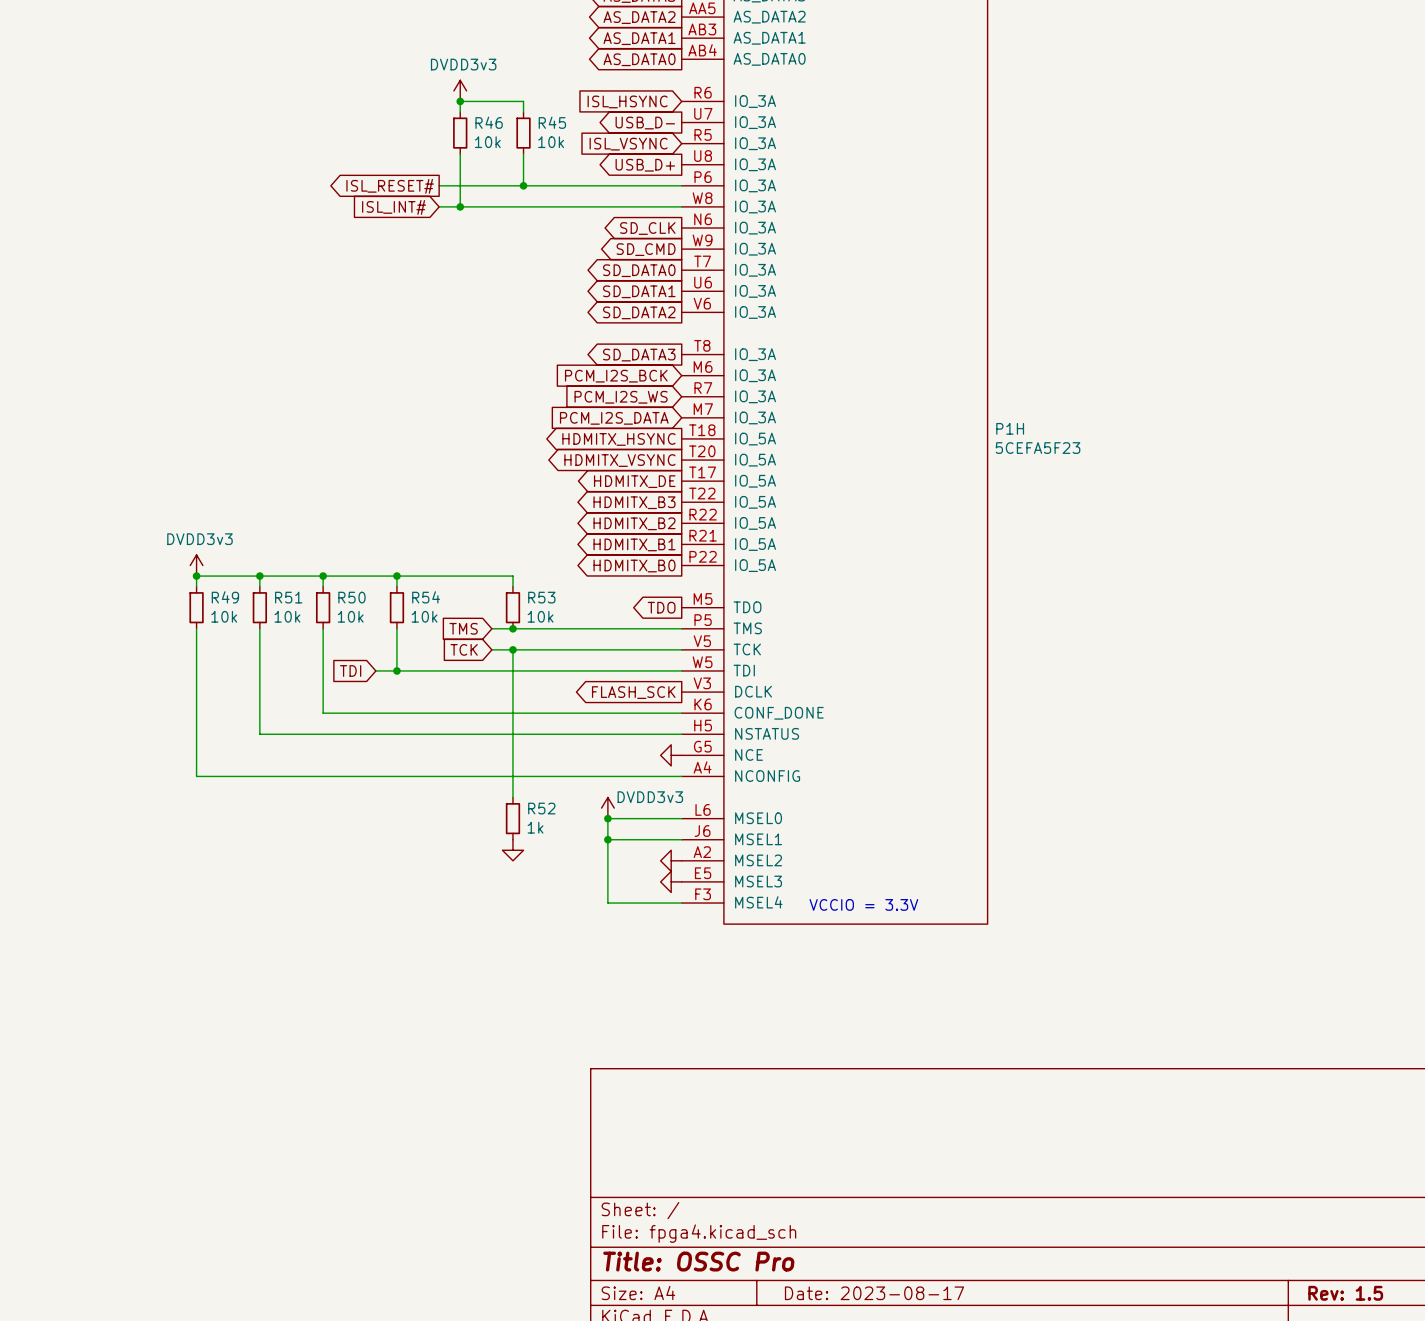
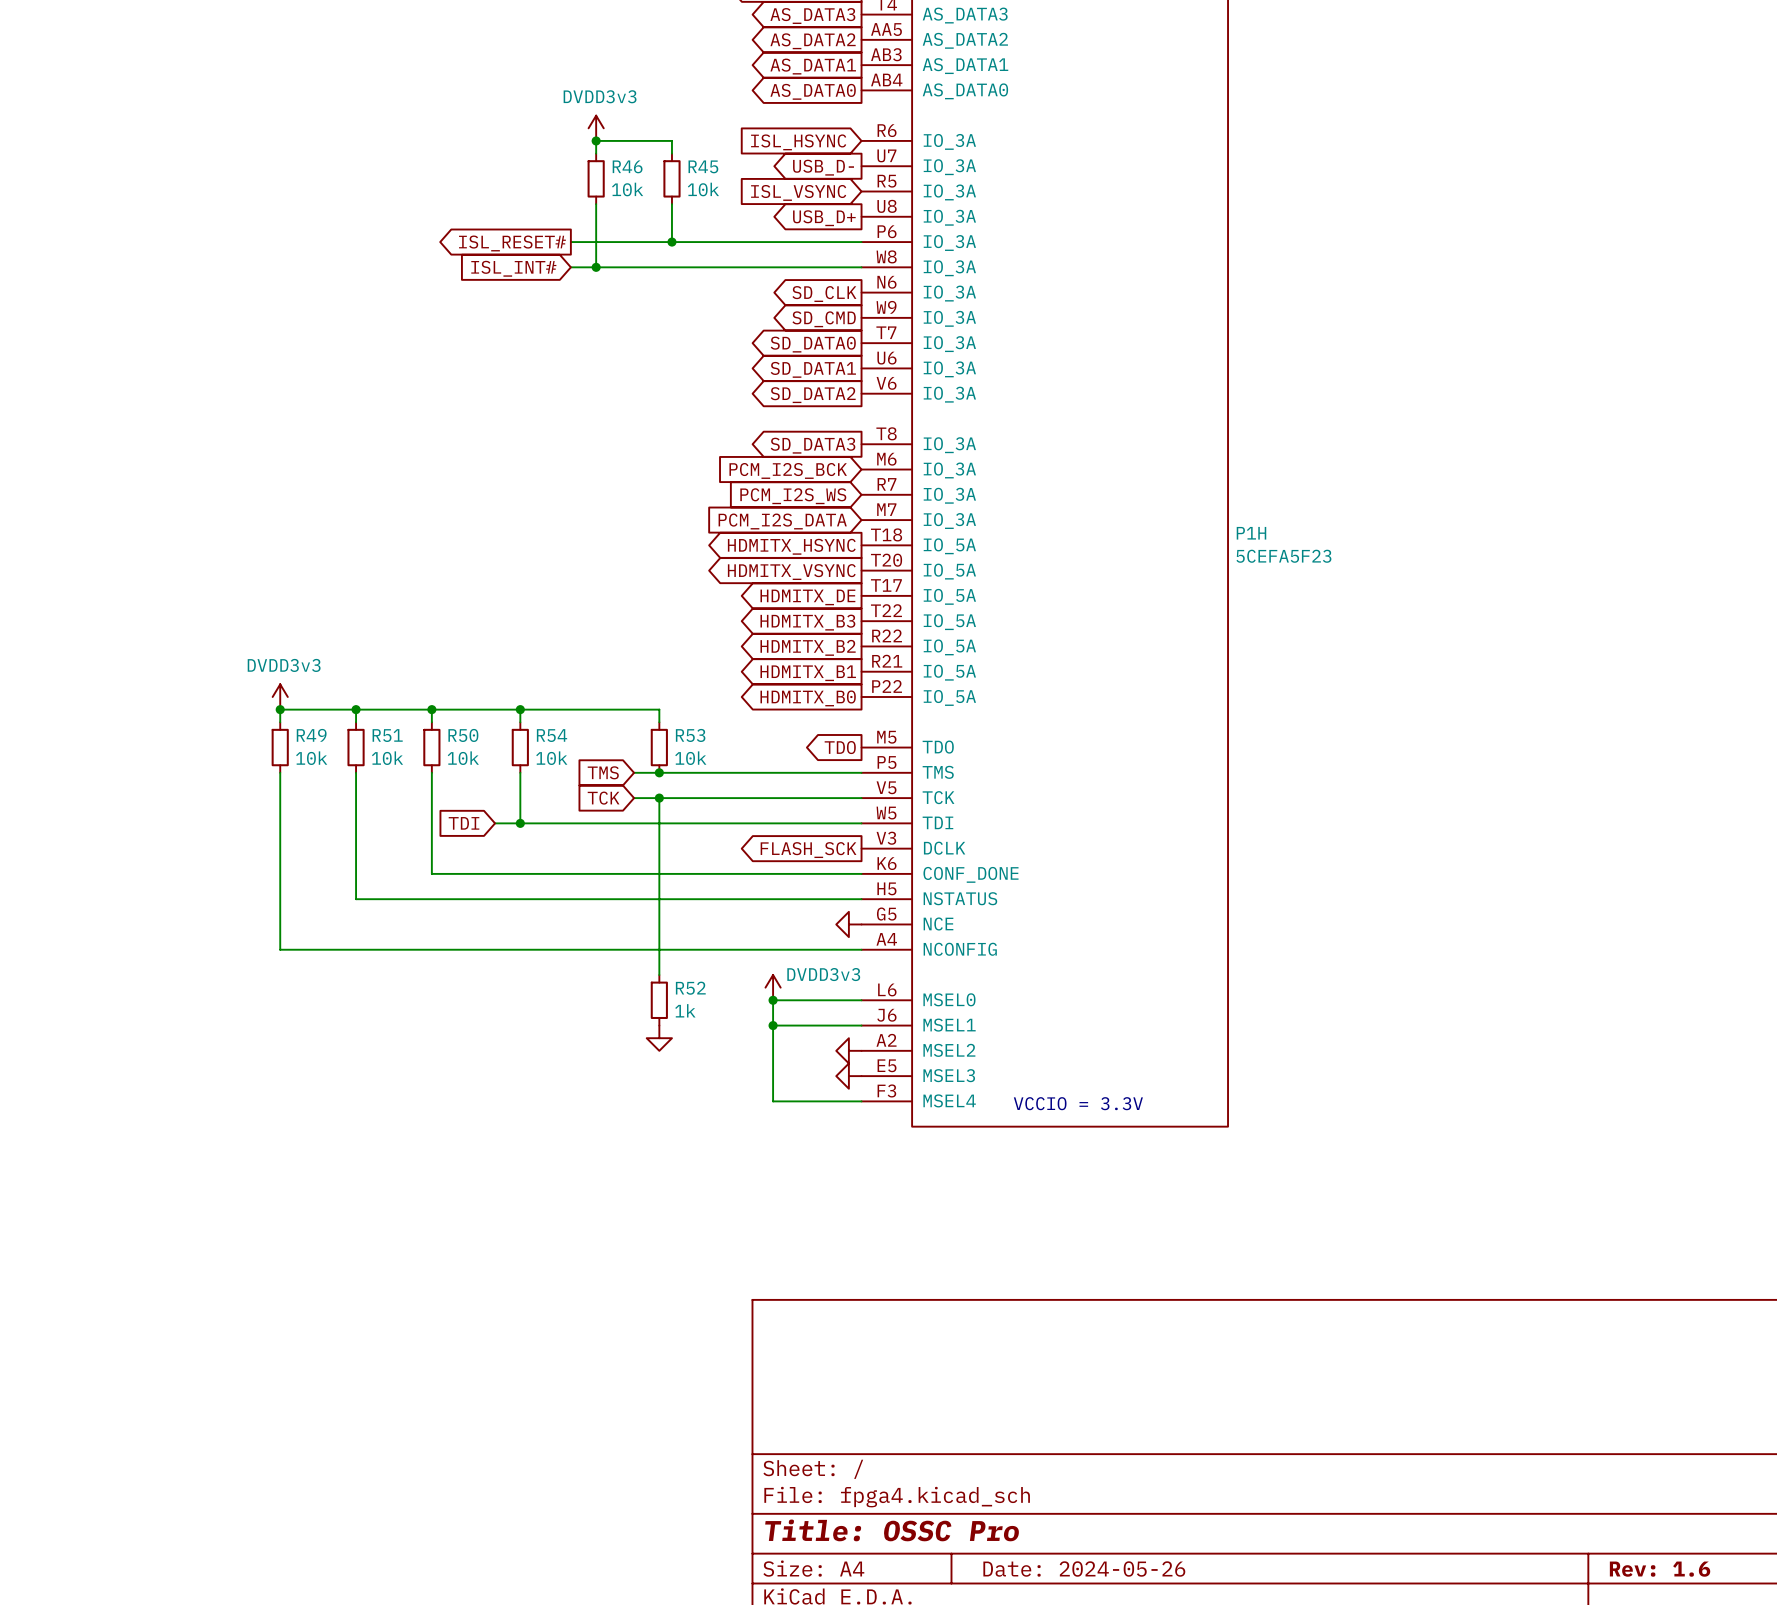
title block: Date: 2023-08-17 (874, 1293) -> Date: 2024-05-26 (1084, 1569)
title block: Rev: 1.5 (1345, 1293) -> Rev: 1.6 (1660, 1569)

